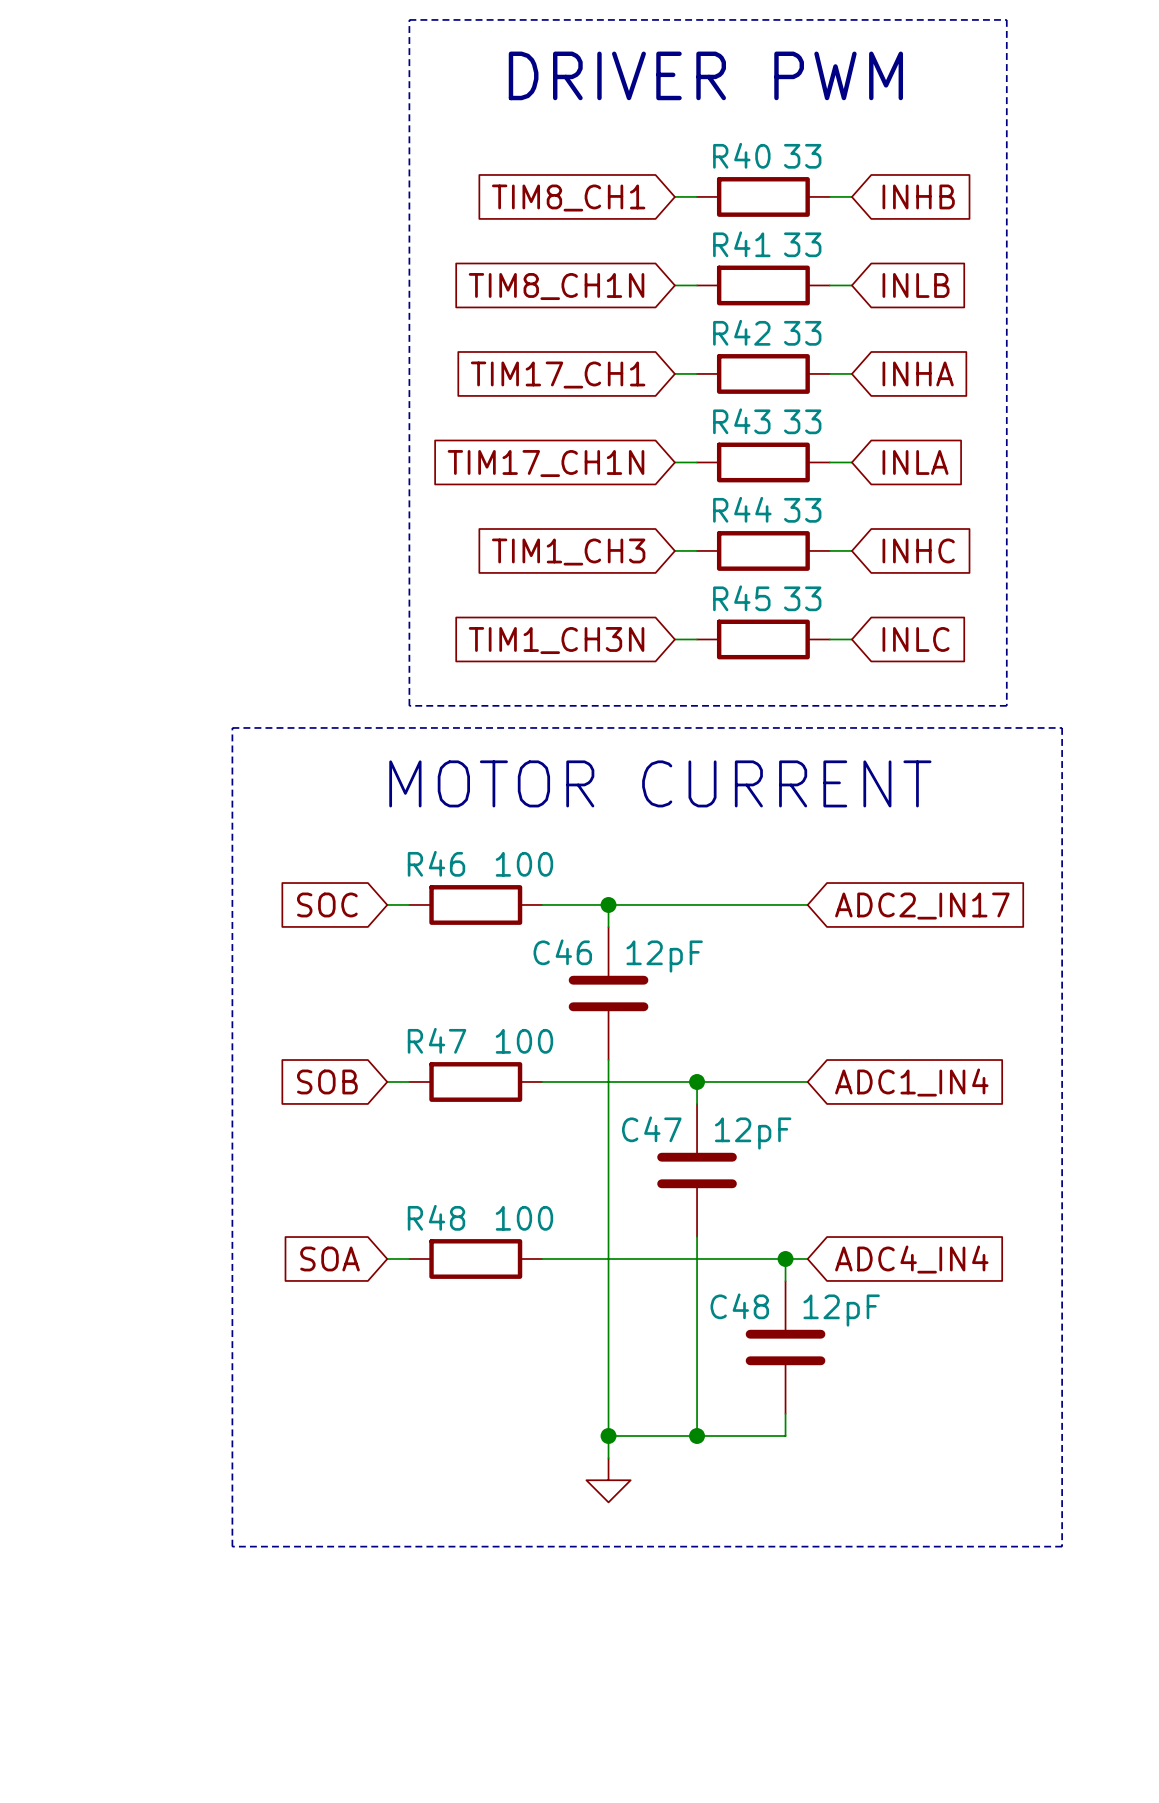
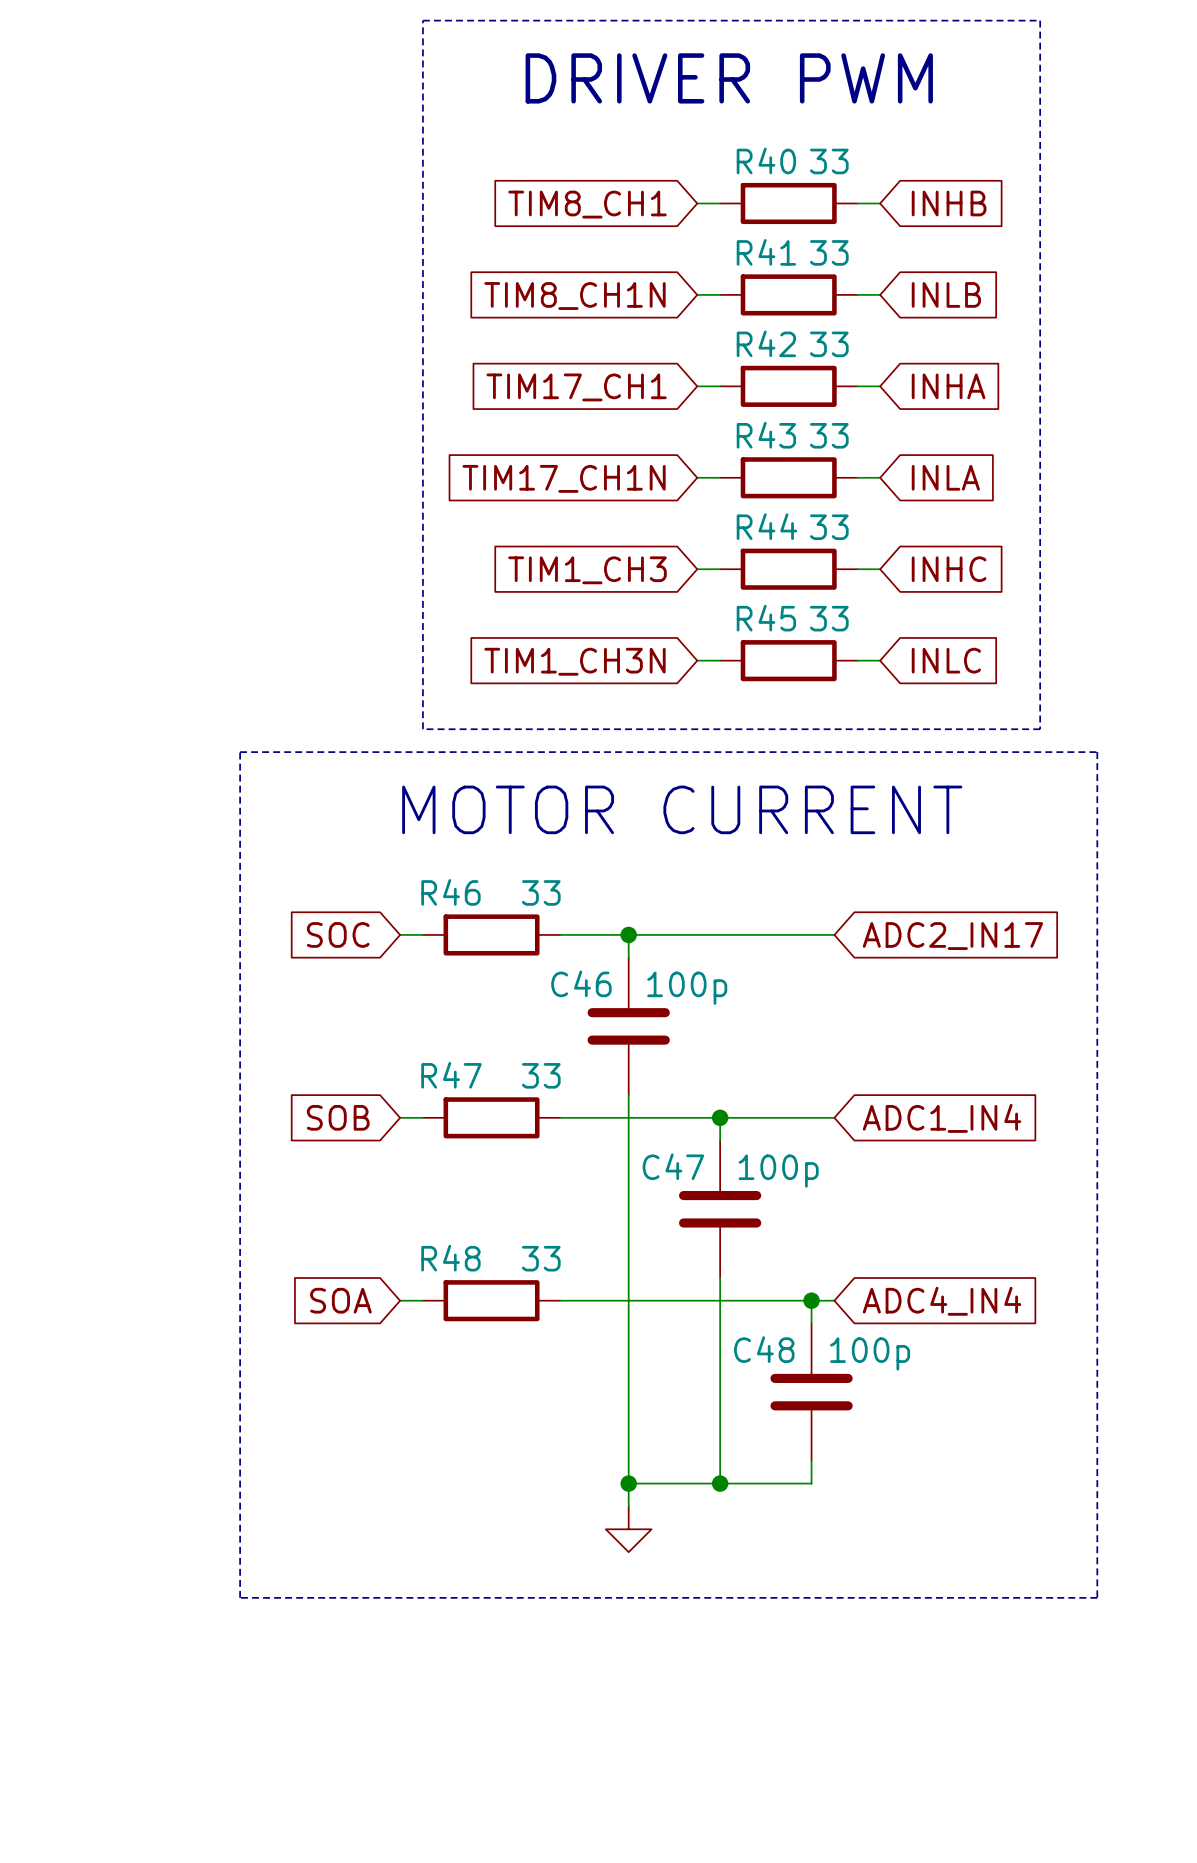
R46 value: 100 (524, 864) -> 33 (541, 892)
C46 value: 12pF (664, 956) -> 100p (687, 988)
R47 value: 100 (524, 1041) -> 33 (541, 1075)
C47 value: 12pF (753, 1133) -> 100p (778, 1171)
R48 value: 100 (524, 1218) -> 33 (541, 1258)
C48 value: 12pF (841, 1310) -> 100p (870, 1353)

